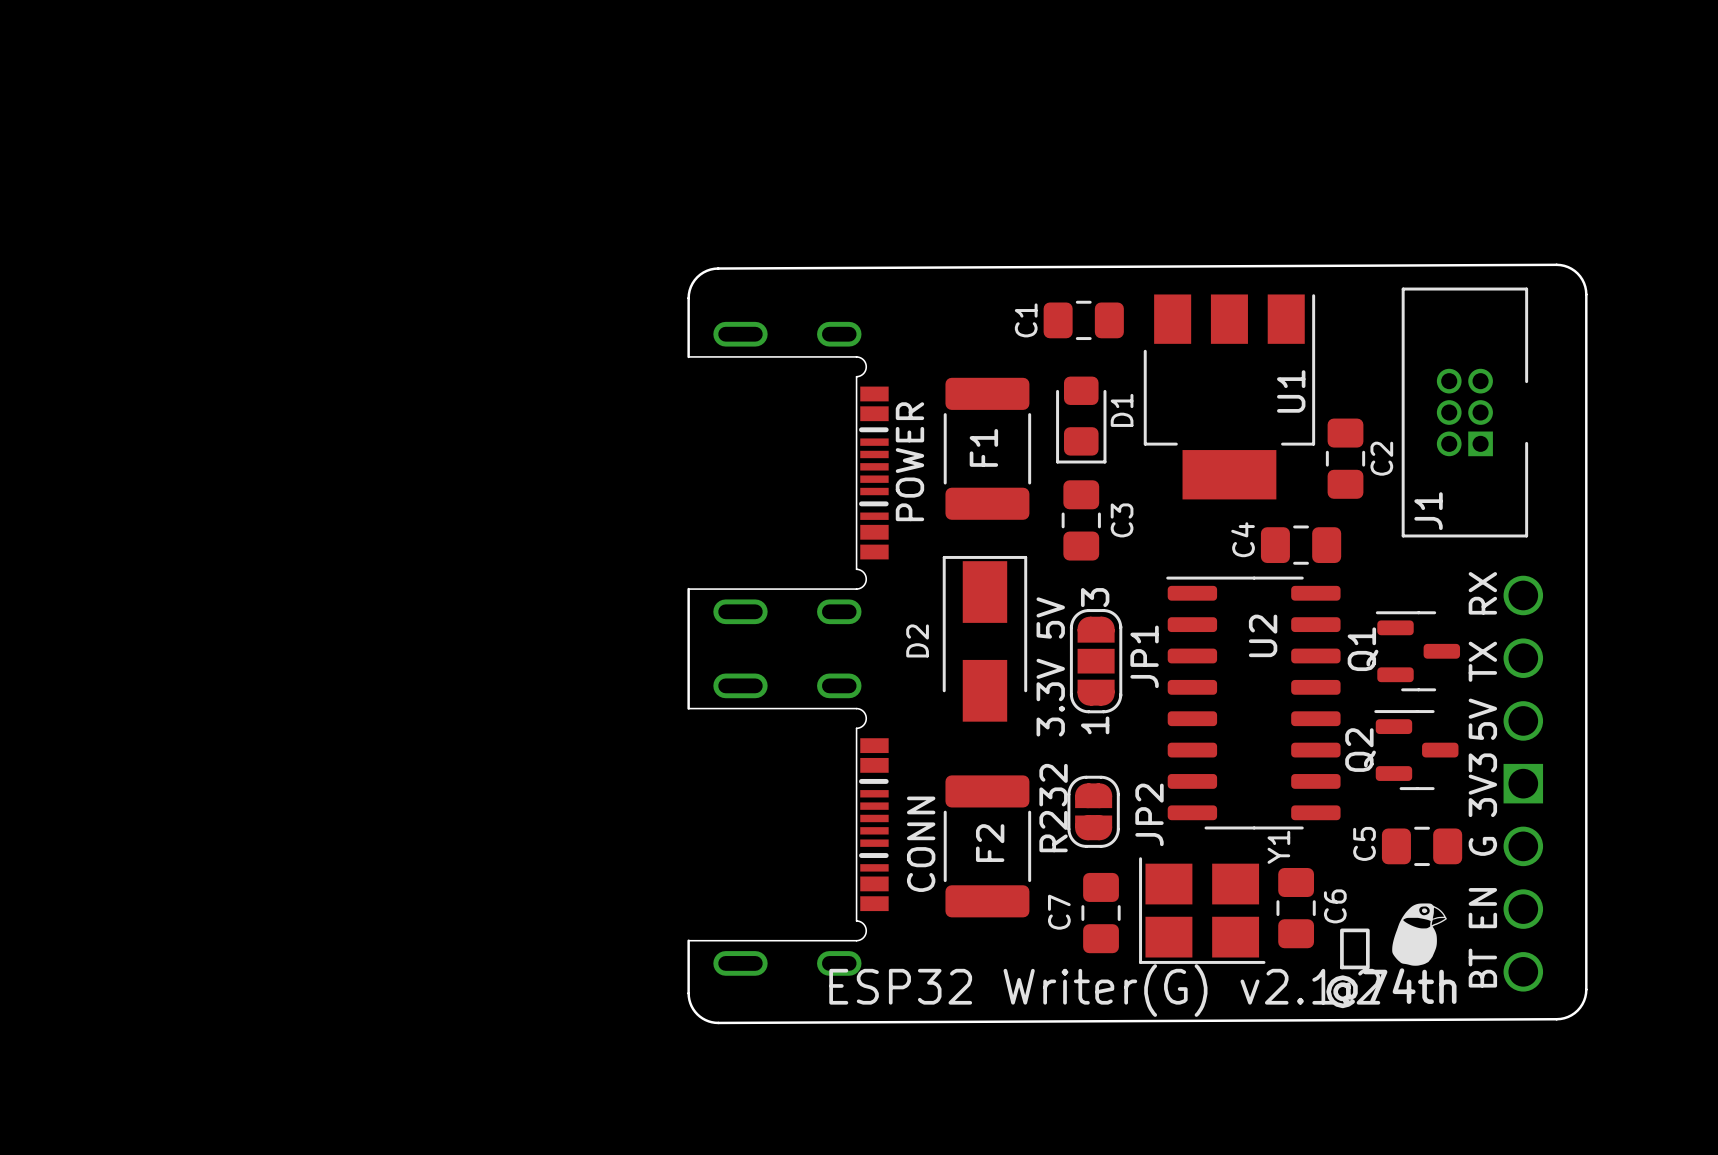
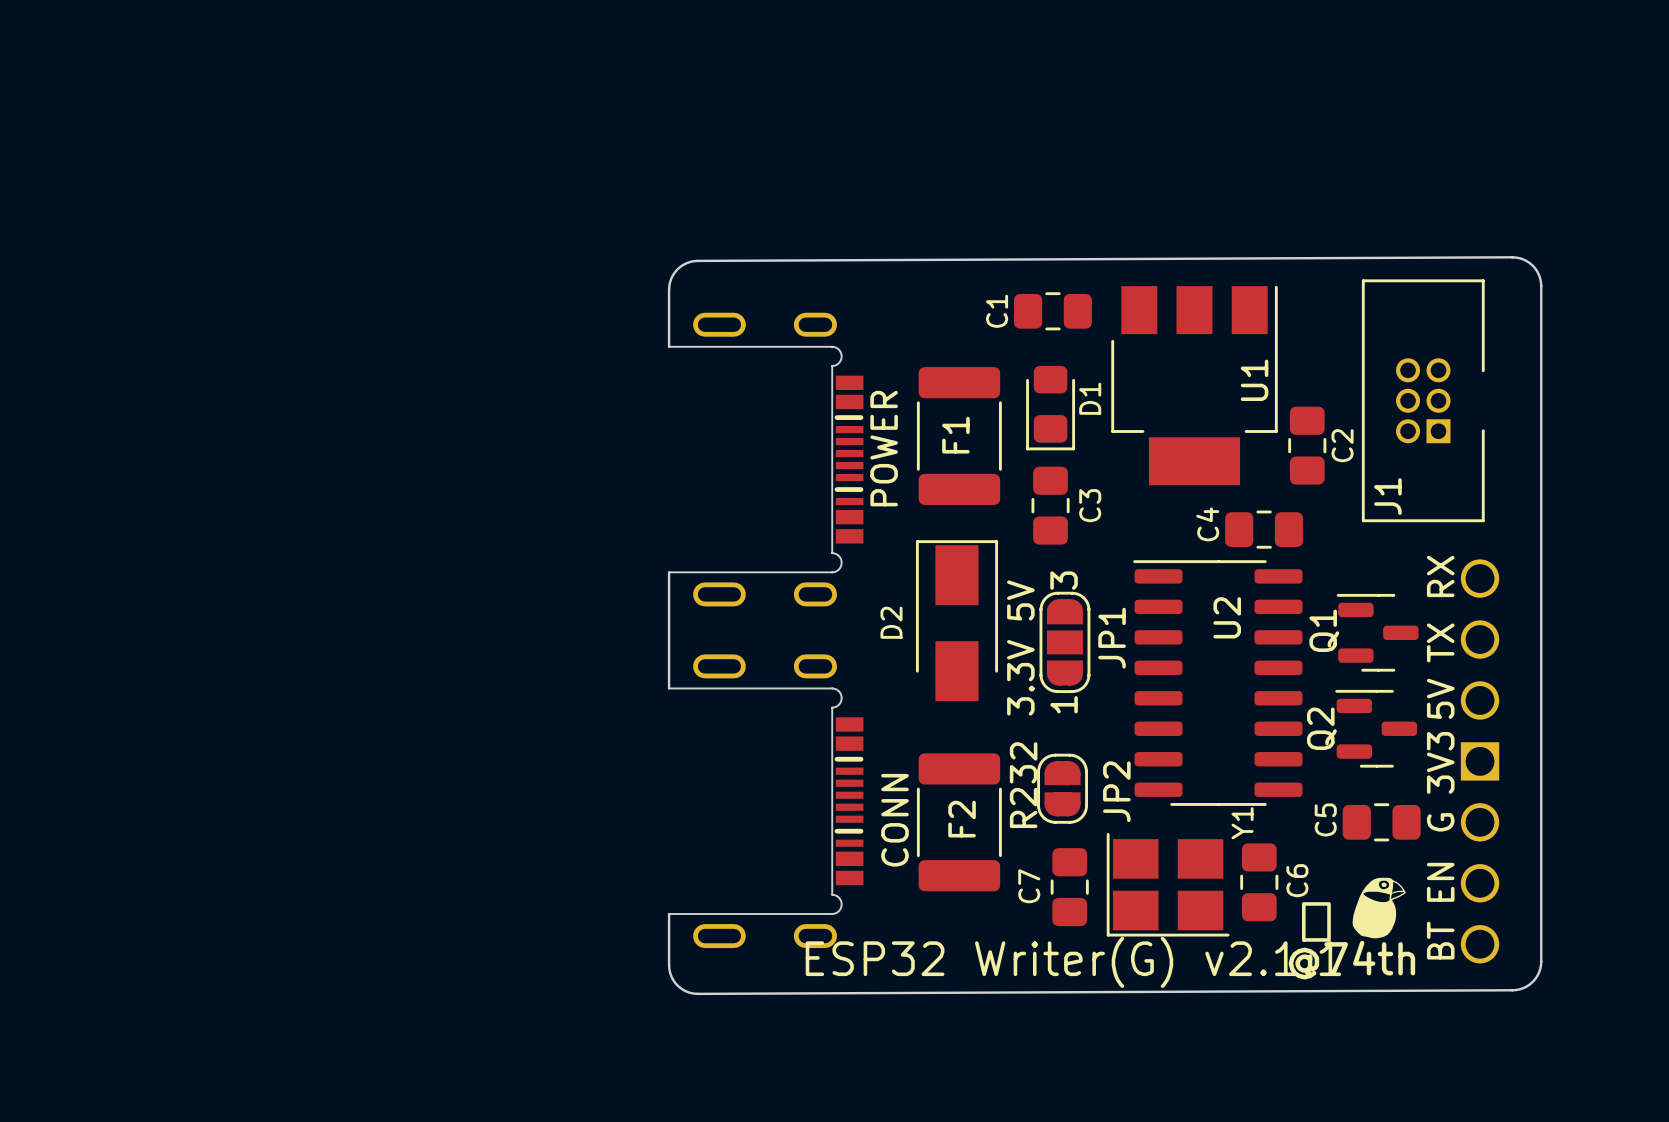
text: ESP32 Writer(G) v2.1.2 (1104, 990) -> ESP32 Writer(G) v2.1.1 (1073, 962)

